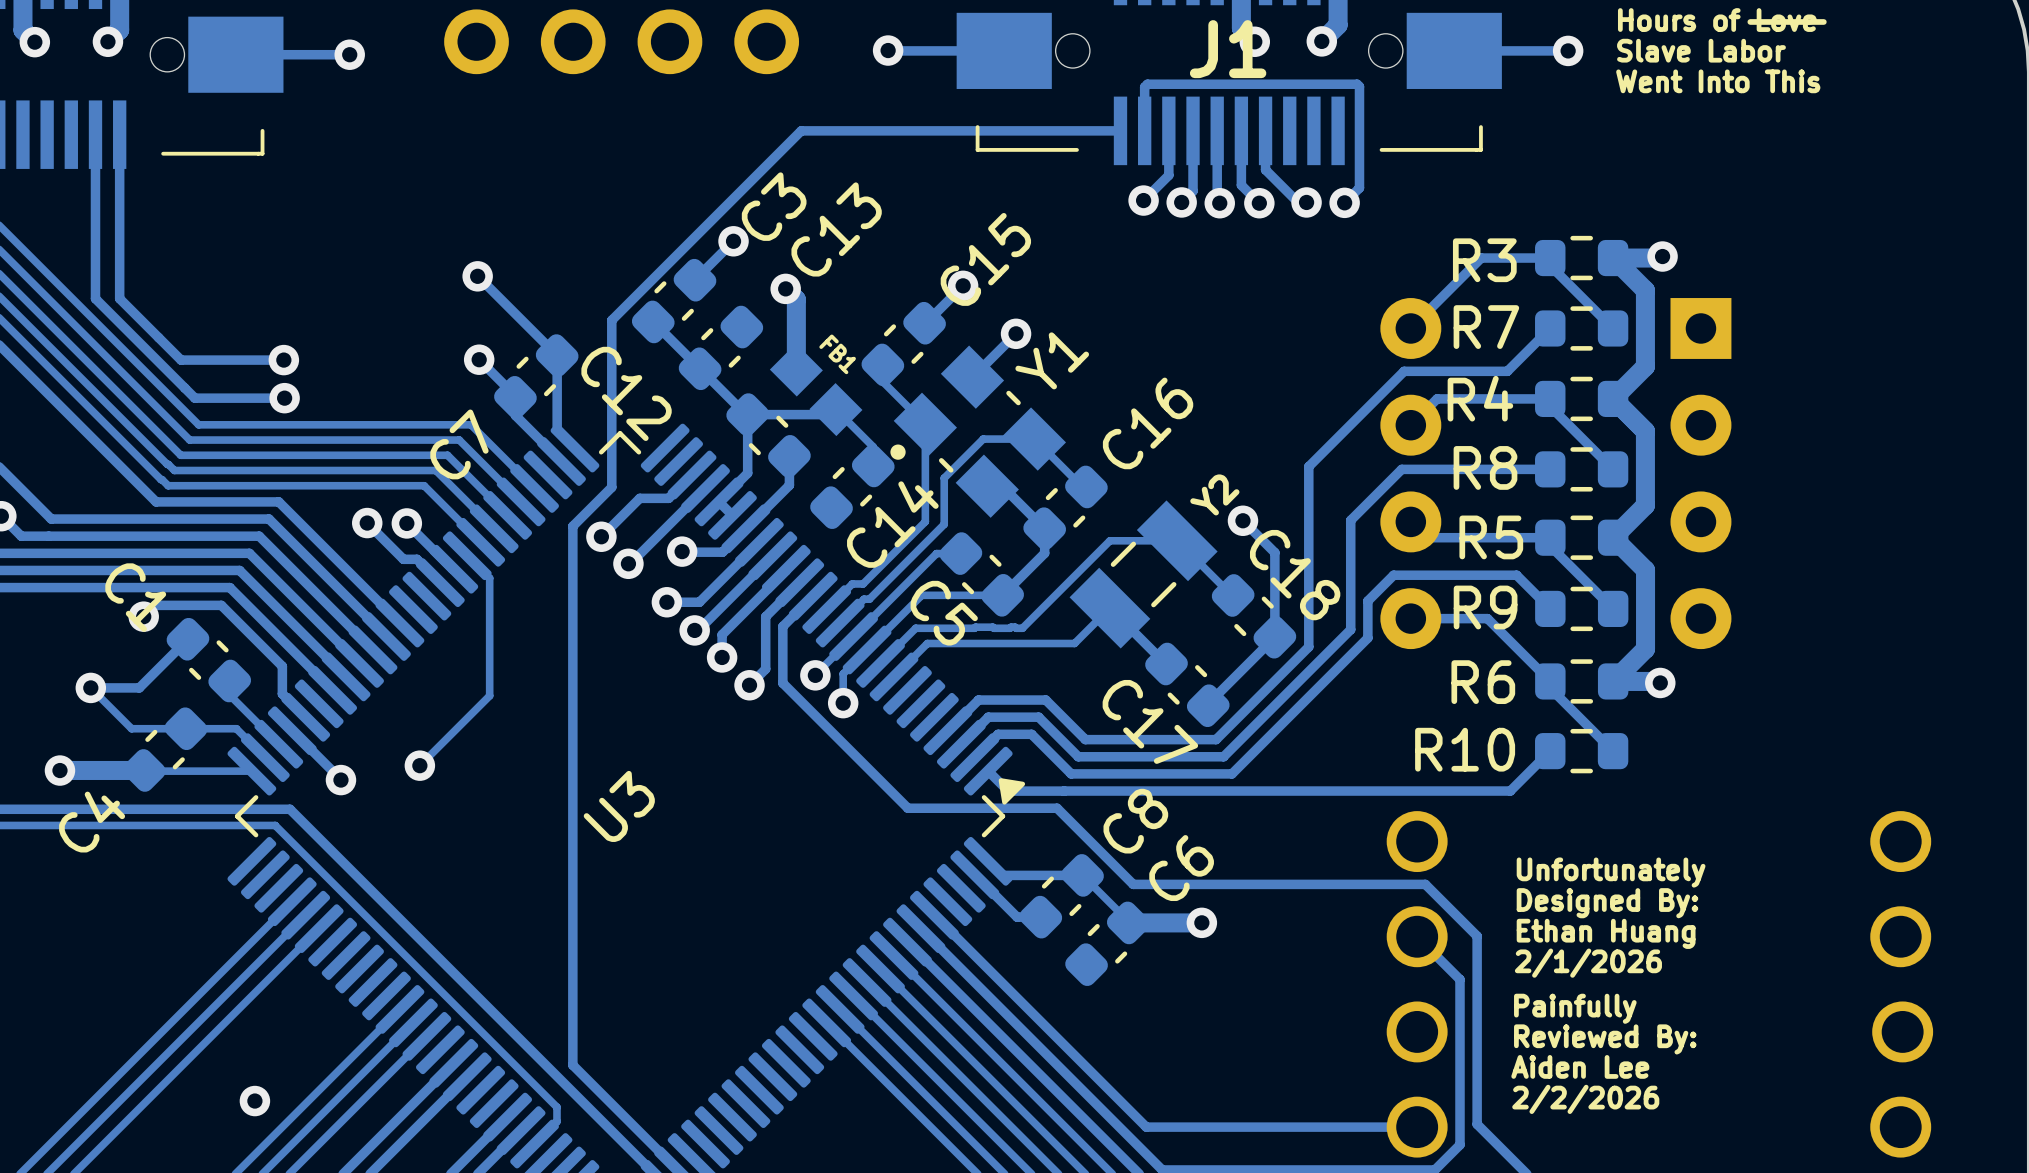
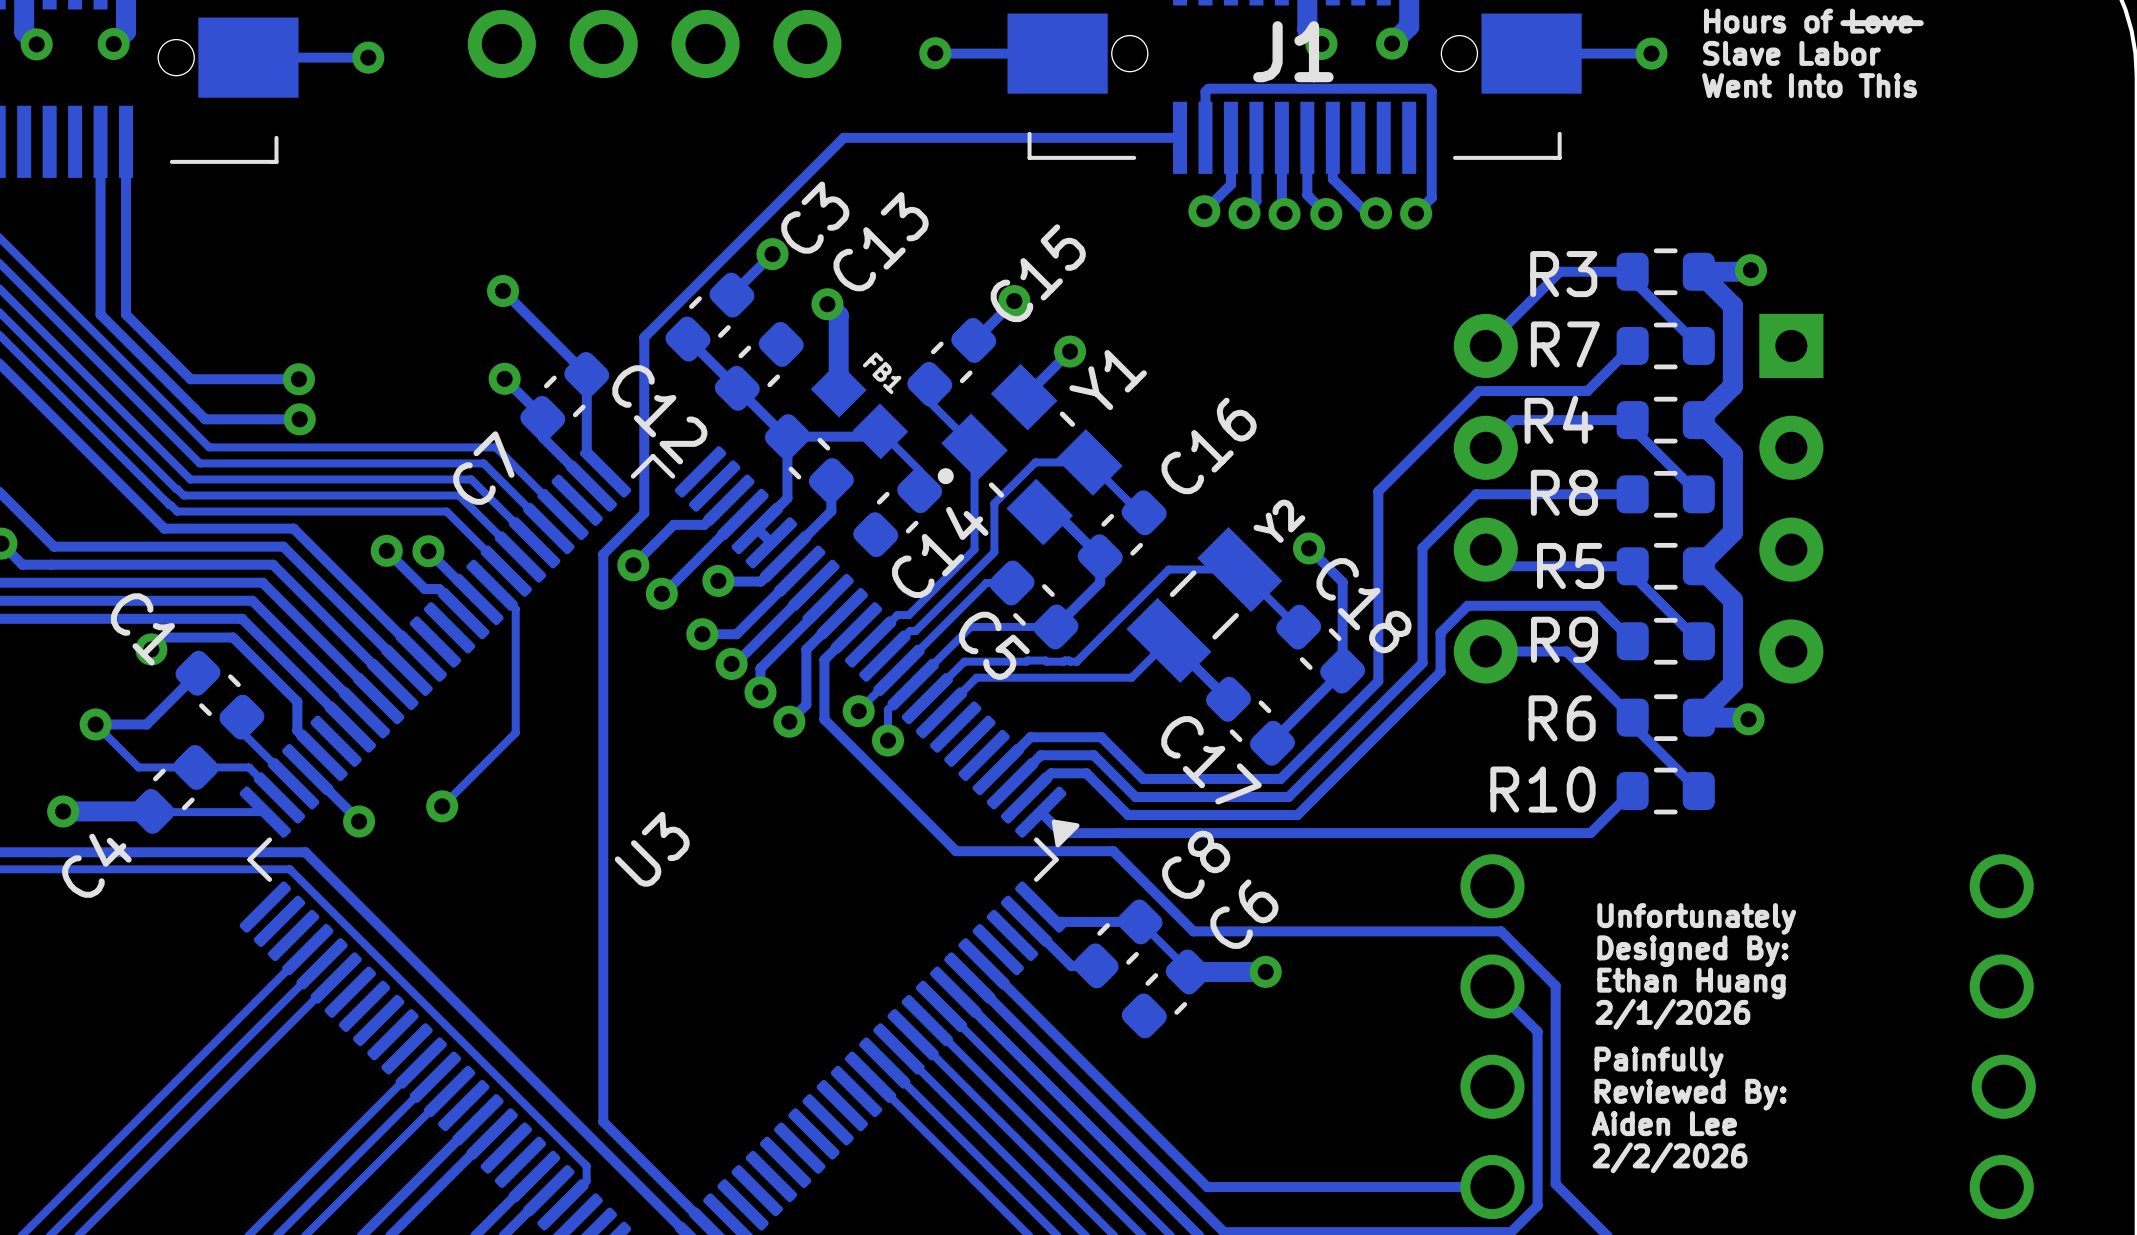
via: (254, 1101) -> none

